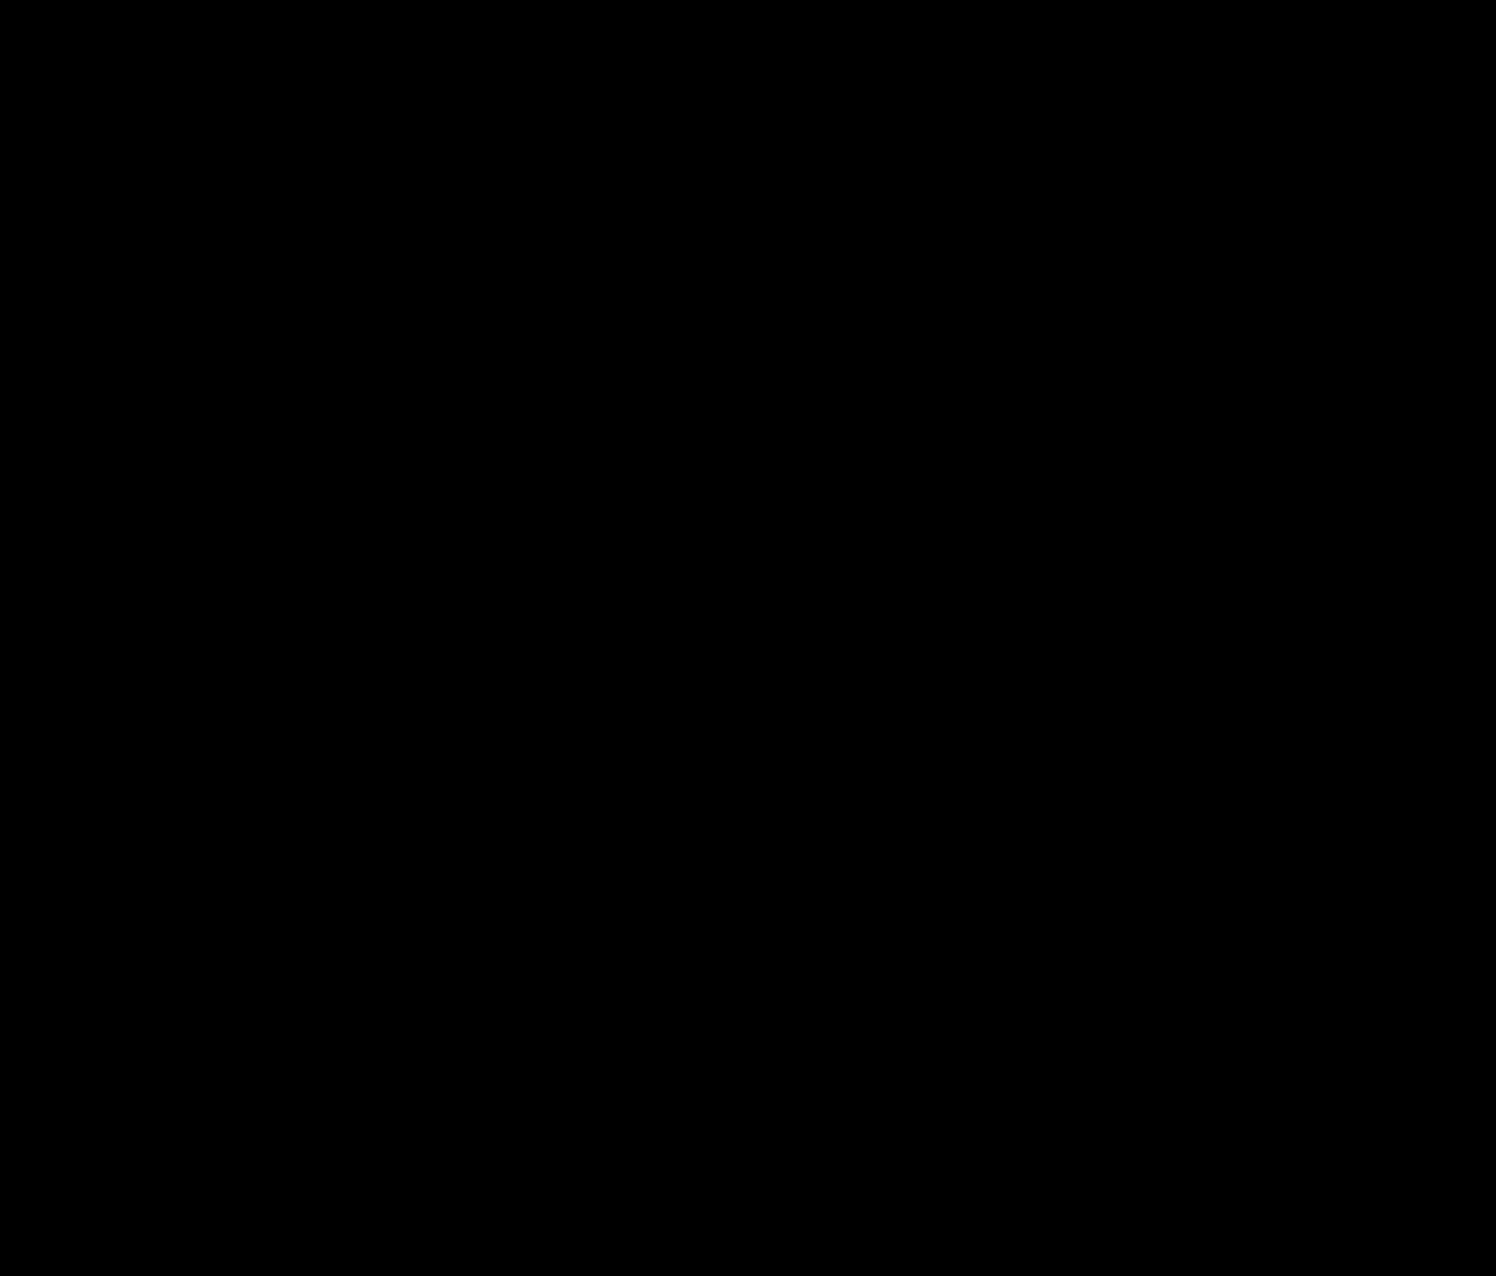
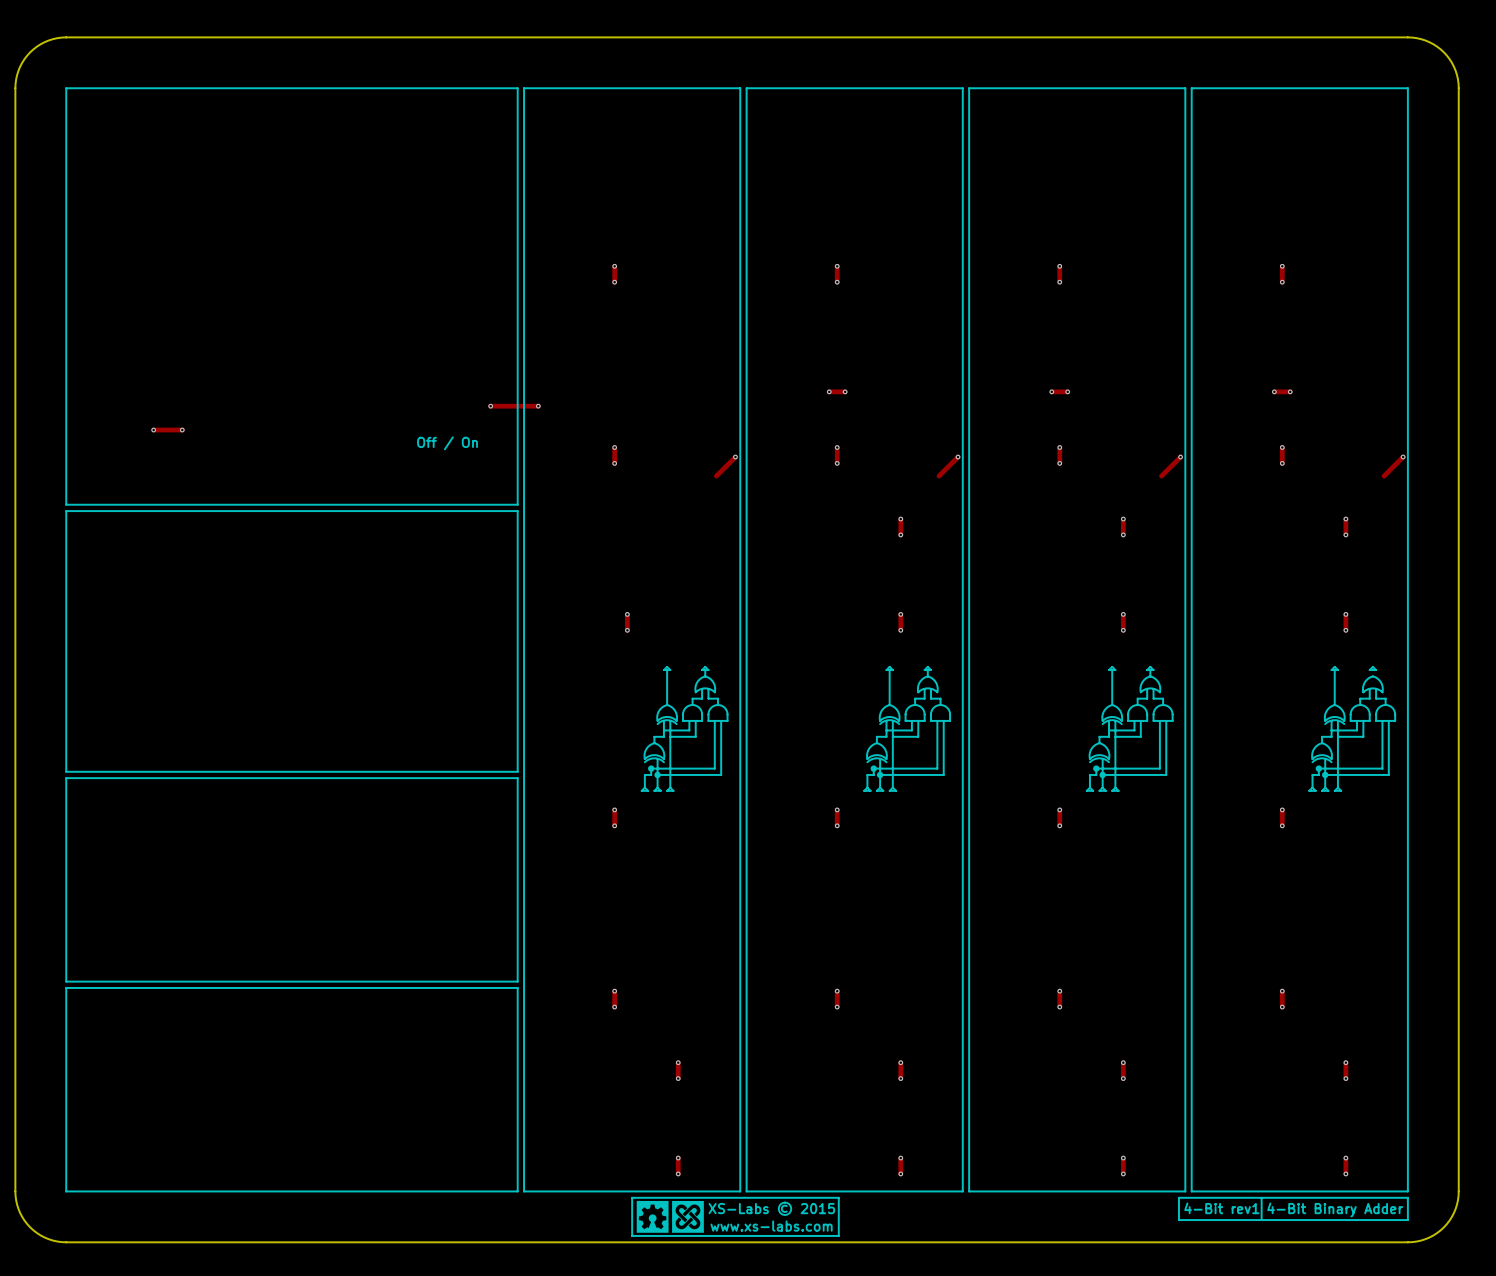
board edge: none -> (66, 37) (1407, 37) (1425, 40) (1440, 49) (1453, 66) (1458, 88) (1458, 1191) (1455, 1208) (1446, 1224) (1429, 1237) (1407, 1242) (66, 1242) (48, 1239) (33, 1230) (20, 1212) (15, 1191) (15, 88) (20, 66) (30, 52) (44, 42) (66, 37)
line: none -> (66, 88) (517, 88) (517, 504) (66, 504) (66, 88)
line: none -> (524, 88) (740, 88) (740, 1191) (524, 1191) (524, 88)
line: none -> (746, 88) (962, 88) (962, 1191) (746, 1191) (746, 88)
line: none -> (969, 88) (1185, 88) (1185, 1191) (969, 1191) (969, 88)
line: none -> (1191, 88) (1407, 88) (1407, 1191) (1191, 1191) (1191, 88)
track: none -> (614, 266) (614, 282)
via: none -> (614, 266)
track: none -> (837, 266) (837, 282)
via: none -> (837, 266)
track: none -> (1059, 266) (1059, 282)
via: none -> (1059, 266)
track: none -> (1282, 266) (1282, 282)
via: none -> (1282, 266)
via: none -> (614, 282)
via: none -> (837, 282)
via: none -> (1059, 282)
via: none -> (1282, 282)
track: none -> (829, 391) (845, 391)
via: none -> (829, 391)
via: none -> (845, 391)
track: none -> (1051, 391) (1067, 391)
via: none -> (1051, 391)
via: none -> (1067, 391)
track: none -> (1274, 391) (1290, 391)
via: none -> (1274, 391)
via: none -> (1290, 391)
track: none -> (490, 406) (538, 406)
via: none -> (490, 406)
via: none -> (538, 406)
track: none -> (153, 430) (182, 430)
via: none -> (153, 430)
via: none -> (182, 430)
text: none -> Off / On (447, 443)
track: none -> (614, 447) (614, 463)
via: none -> (614, 447)
track: none -> (837, 447) (837, 463)
via: none -> (837, 447)
track: none -> (1059, 447) (1059, 463)
via: none -> (1059, 447)
track: none -> (1282, 447) (1282, 463)
via: none -> (1282, 447)
track: none -> (735, 457) (716, 476)
via: none -> (735, 457)
track: none -> (958, 457) (938, 476)
via: none -> (958, 457)
track: none -> (1180, 457) (1161, 476)
via: none -> (1180, 457)
track: none -> (1403, 457) (1384, 476)
via: none -> (1403, 457)
via: none -> (614, 463)
via: none -> (837, 463)
via: none -> (1059, 463)
via: none -> (1282, 463)
line: none -> (66, 511) (517, 511) (517, 771) (66, 771) (66, 511)
track: none -> (900, 519) (900, 534)
via: none -> (900, 519)
track: none -> (1123, 519) (1123, 534)
via: none -> (1123, 519)
track: none -> (1345, 519) (1345, 534)
via: none -> (1345, 519)
via: none -> (900, 534)
via: none -> (1123, 534)
via: none -> (1345, 534)
track: none -> (627, 614) (627, 630)
via: none -> (627, 614)
track: none -> (900, 614) (900, 630)
via: none -> (900, 614)
track: none -> (1123, 614) (1123, 630)
via: none -> (1123, 614)
track: none -> (1345, 614) (1345, 630)
via: none -> (1345, 614)
via: none -> (627, 630)
via: none -> (900, 630)
via: none -> (1123, 630)
via: none -> (1345, 630)
line: none -> (667, 666) (663, 670) (670, 670) (667, 666)
line: none -> (705, 666) (702, 670) (708, 670) (705, 666)
line: none -> (889, 666) (892, 670) (886, 670) (889, 666)
line: none -> (927, 666) (930, 670) (924, 670) (927, 666)
line: none -> (1112, 666) (1109, 670) (1115, 670) (1112, 666)
line: none -> (1150, 666) (1147, 670) (1153, 670) (1150, 666)
line: none -> (1334, 666) (1337, 670) (1331, 670) (1334, 666)
line: none -> (1372, 666) (1376, 670) (1369, 670) (1372, 666)
line: none -> (667, 670) (667, 705)
line: none -> (705, 670) (705, 676)
line: none -> (889, 670) (889, 705)
line: none -> (927, 670) (927, 676)
line: none -> (1112, 670) (1112, 705)
line: none -> (1150, 670) (1150, 676)
line: none -> (1334, 670) (1334, 705)
line: none -> (705, 676) (713, 682) (714, 692) (705, 688) (695, 692) (697, 682) (705, 676)
line: none -> (927, 676) (919, 682) (918, 692) (927, 688) (937, 692) (935, 682) (927, 676)
line: none -> (1150, 676) (1158, 682) (1159, 692) (1150, 688) (1140, 692) (1142, 682) (1150, 676)
line: none -> (1372, 676) (1364, 682) (1363, 692) (1372, 688) (1382, 692) (1380, 682) (1372, 676)
line: none -> (702, 689) (702, 698) (692, 698) (692, 705)
line: none -> (708, 689) (708, 698) (717, 698) (717, 705)
line: none -> (924, 689) (924, 698) (915, 698) (915, 705)
line: none -> (930, 689) (930, 698) (940, 698) (940, 705)
line: none -> (1147, 689) (1147, 698) (1137, 698) (1137, 705)
line: none -> (1153, 689) (1153, 698) (1163, 698) (1163, 705)
line: none -> (1369, 689) (1369, 698) (1360, 698) (1360, 705)
line: none -> (1376, 689) (1376, 698) (1385, 698) (1385, 705)
line: none -> (667, 705) (675, 710) (676, 720) (667, 716) (657, 720) (659, 710) (667, 705)
line: none -> (889, 705) (881, 710) (880, 720) (889, 716) (899, 720) (897, 710) (889, 705)
line: none -> (1112, 705) (1120, 710) (1121, 720) (1112, 716) (1102, 720) (1104, 710) (1112, 705)
line: none -> (1334, 705) (1326, 710) (1325, 720) (1334, 716) (1344, 720) (1342, 710) (1334, 705)
line: none -> (683, 714) (683, 720) (702, 720) (701, 710) (695, 705) (686, 706) (683, 714)
line: none -> (708, 714) (708, 720) (727, 720) (726, 710) (720, 705) (712, 706) (708, 714)
line: none -> (905, 714) (905, 720) (924, 720) (923, 710) (917, 705) (909, 706) (905, 714)
line: none -> (930, 714) (930, 720) (950, 720) (949, 710) (943, 705) (934, 706) (930, 714)
line: none -> (1128, 714) (1128, 720) (1147, 720) (1146, 710) (1140, 705) (1131, 706) (1128, 714)
line: none -> (1153, 714) (1153, 720) (1172, 720) (1171, 710) (1165, 705) (1157, 706) (1153, 714)
line: none -> (1350, 714) (1350, 720) (1369, 720) (1369, 710) (1362, 705) (1354, 706) (1350, 714)
line: none -> (1376, 714) (1376, 720) (1395, 720) (1394, 710) (1388, 705) (1379, 706) (1376, 714)
line: none -> (663, 720) (663, 736) (654, 736) (654, 743)
line: none -> (670, 720) (670, 787)
line: none -> (689, 720) (689, 730) (663, 730)
line: none -> (695, 720) (695, 736) (670, 736)
line: none -> (714, 720) (714, 768) (651, 768) (651, 774) (644, 774) (644, 787)
line: none -> (721, 720) (721, 774) (657, 774)
line: none -> (886, 720) (886, 736) (876, 736) (876, 743)
line: none -> (892, 720) (892, 787)
line: none -> (911, 720) (911, 730) (886, 730)
line: none -> (918, 720) (918, 736) (892, 736)
line: none -> (937, 720) (937, 768) (873, 768) (873, 774) (867, 774) (867, 787)
line: none -> (943, 720) (943, 774) (880, 774)
line: none -> (1109, 720) (1109, 736) (1099, 736) (1099, 743)
line: none -> (1115, 720) (1115, 787)
line: none -> (1134, 720) (1134, 730) (1109, 730)
line: none -> (1140, 720) (1140, 736) (1115, 736)
line: none -> (1159, 720) (1159, 768) (1096, 768) (1096, 774) (1089, 774) (1089, 787)
line: none -> (1166, 720) (1166, 774) (1102, 774)
line: none -> (1331, 720) (1331, 736) (1322, 736) (1322, 743)
line: none -> (1337, 720) (1337, 787)
line: none -> (1357, 720) (1357, 730) (1331, 730)
line: none -> (1363, 720) (1363, 736) (1337, 736)
line: none -> (1382, 720) (1382, 768) (1318, 768) (1318, 774) (1312, 774) (1312, 787)
line: none -> (1388, 720) (1388, 774) (1325, 774)
line: none -> (657, 724) (667, 720) (676, 724)
line: none -> (880, 724) (889, 720) (899, 724)
line: none -> (1102, 724) (1112, 720) (1121, 724)
line: none -> (1325, 724) (1334, 720) (1344, 724)
line: none -> (654, 743) (646, 749) (644, 759) (654, 755) (663, 759) (662, 749) (654, 743)
line: none -> (876, 743) (885, 749) (886, 759) (876, 755) (867, 759) (868, 749) (876, 743)
line: none -> (1099, 743) (1091, 749) (1089, 759) (1099, 755) (1109, 759) (1107, 749) (1099, 743)
line: none -> (1322, 743) (1330, 749) (1331, 759) (1322, 755) (1312, 759) (1313, 749) (1322, 743)
line: none -> (657, 759) (657, 787)
line: none -> (880, 759) (880, 787)
line: none -> (1102, 759) (1102, 787)
line: none -> (1325, 759) (1325, 787)
line: none -> (644, 762) (654, 758) (663, 762)
line: none -> (867, 762) (876, 758) (886, 762)
line: none -> (1089, 762) (1099, 758) (1109, 762)
line: none -> (1312, 762) (1322, 758) (1331, 762)
drawing: none -> [648, 765, 661, 779]
drawing: none -> [870, 765, 884, 779]
drawing: none -> [1093, 765, 1106, 779]
drawing: none -> [1315, 765, 1329, 779]
line: none -> (66, 778) (66, 981) (517, 981) (517, 778) (66, 778)
line: none -> (644, 787) (648, 790) (641, 790) (644, 787)
line: none -> (657, 787) (660, 790) (654, 790) (657, 787)
line: none -> (670, 787) (673, 790) (667, 790) (670, 787)
line: none -> (867, 787) (864, 790) (870, 790) (867, 787)
line: none -> (880, 787) (876, 790) (883, 790) (880, 787)
line: none -> (892, 787) (889, 790) (896, 790) (892, 787)
line: none -> (1089, 787) (1093, 790) (1086, 790) (1089, 787)
line: none -> (1102, 787) (1105, 790) (1099, 790) (1102, 787)
line: none -> (1115, 787) (1118, 790) (1112, 790) (1115, 787)
line: none -> (1312, 787) (1309, 790) (1315, 790) (1312, 787)
line: none -> (1325, 787) (1322, 790) (1328, 790) (1325, 787)
line: none -> (1337, 787) (1334, 790) (1341, 790) (1337, 787)
track: none -> (614, 809) (614, 825)
via: none -> (614, 809)
track: none -> (837, 809) (837, 825)
via: none -> (837, 809)
track: none -> (1059, 809) (1059, 825)
via: none -> (1059, 809)
track: none -> (1282, 809) (1282, 825)
via: none -> (1282, 809)
via: none -> (614, 825)
via: none -> (837, 825)
via: none -> (1059, 825)
via: none -> (1282, 825)
line: none -> (66, 987) (66, 1191) (517, 1191) (517, 987) (66, 987)
track: none -> (614, 991) (614, 1007)
via: none -> (614, 991)
track: none -> (837, 991) (837, 1007)
via: none -> (837, 991)
track: none -> (1059, 991) (1059, 1007)
via: none -> (1059, 991)
track: none -> (1282, 991) (1282, 1007)
via: none -> (1282, 991)
via: none -> (614, 1007)
via: none -> (837, 1007)
via: none -> (1059, 1007)
via: none -> (1282, 1007)
track: none -> (678, 1062) (678, 1078)
via: none -> (678, 1062)
track: none -> (900, 1062) (900, 1078)
via: none -> (900, 1062)
track: none -> (1123, 1062) (1123, 1078)
via: none -> (1123, 1062)
track: none -> (1345, 1062) (1345, 1078)
via: none -> (1345, 1062)
via: none -> (678, 1078)
via: none -> (900, 1078)
via: none -> (1123, 1078)
via: none -> (1345, 1078)
track: none -> (678, 1158) (678, 1173)
via: none -> (678, 1158)
track: none -> (900, 1158) (900, 1173)
via: none -> (900, 1158)
track: none -> (1123, 1158) (1123, 1173)
via: none -> (1123, 1158)
track: none -> (1345, 1158) (1345, 1173)
via: none -> (1345, 1158)
via: none -> (678, 1173)
via: none -> (900, 1173)
via: none -> (1123, 1173)
via: none -> (1345, 1173)
drawing: none -> [631, 1197, 840, 1237]
line: none -> (1178, 1197) (1178, 1220) (1407, 1220) (1407, 1197) (1178, 1197)
line: none -> (1261, 1197) (1261, 1220)
text: none -> 4-Bit rev1 (1221, 1208)
text: none -> 4-Bit Binary Adder (1335, 1209)

